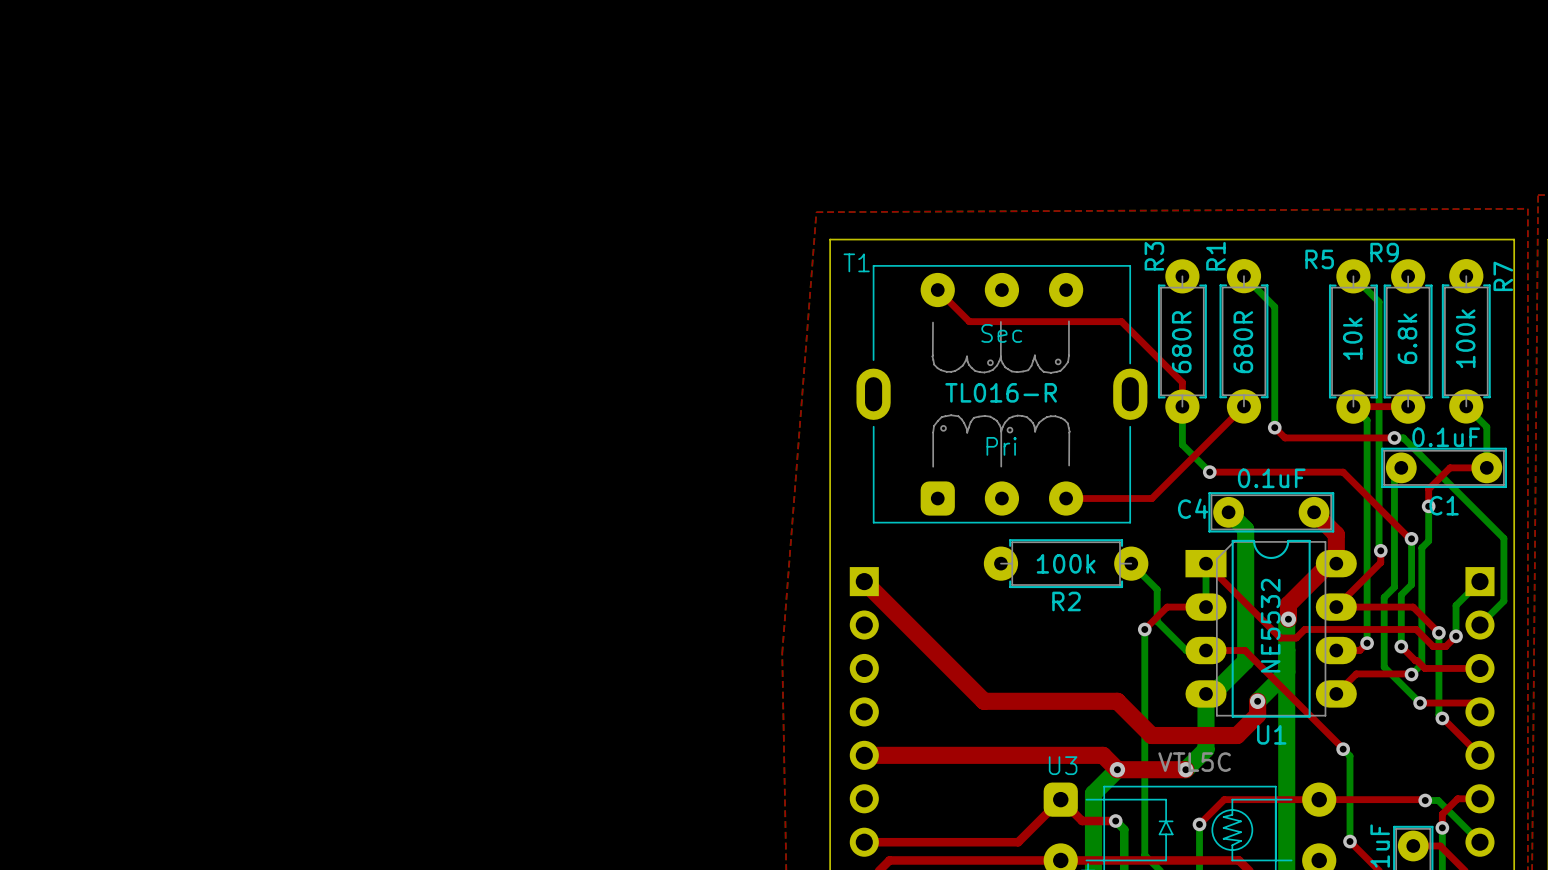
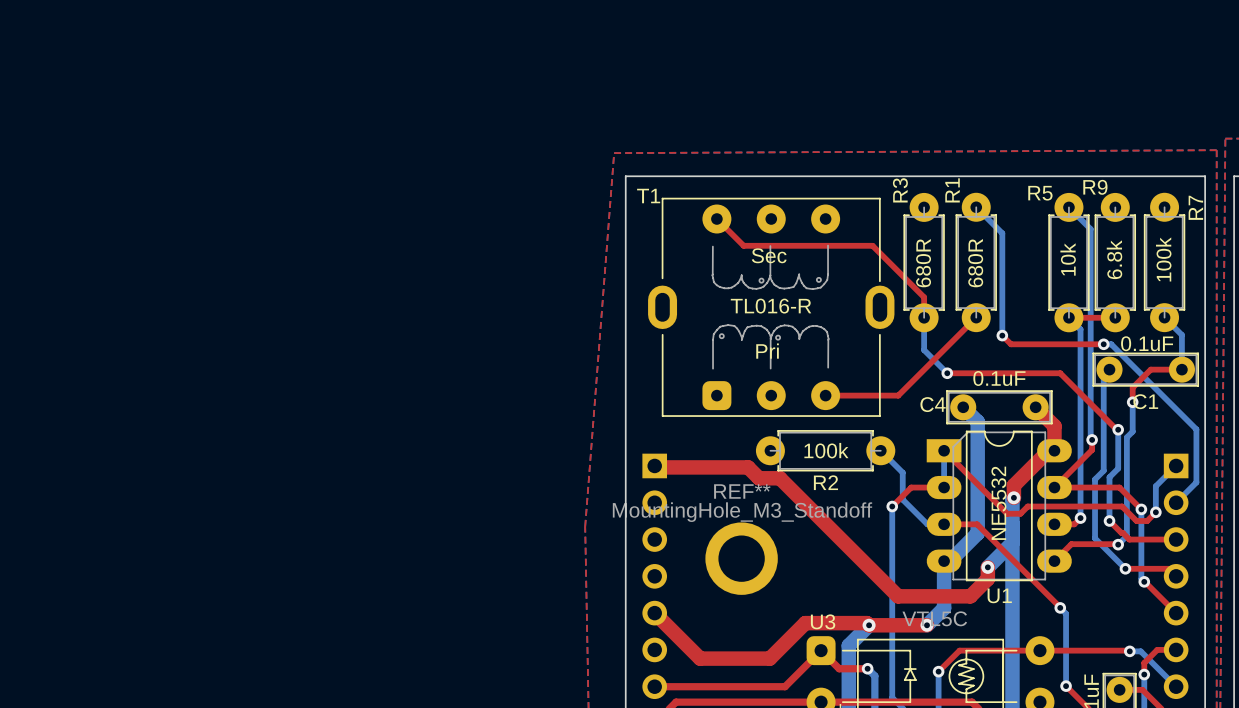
top track: (866, 583) (984, 701) (1117, 701) -> (656, 467) (748, 467) (759, 478) (779, 478) (869, 567)
REF**: none -> MountingHole_M3_Standoff (741, 558)
top track: (864, 755) (1103, 755) (1114, 767) -> (654, 613) (700, 658) (769, 658) (805, 623) (866, 623)

